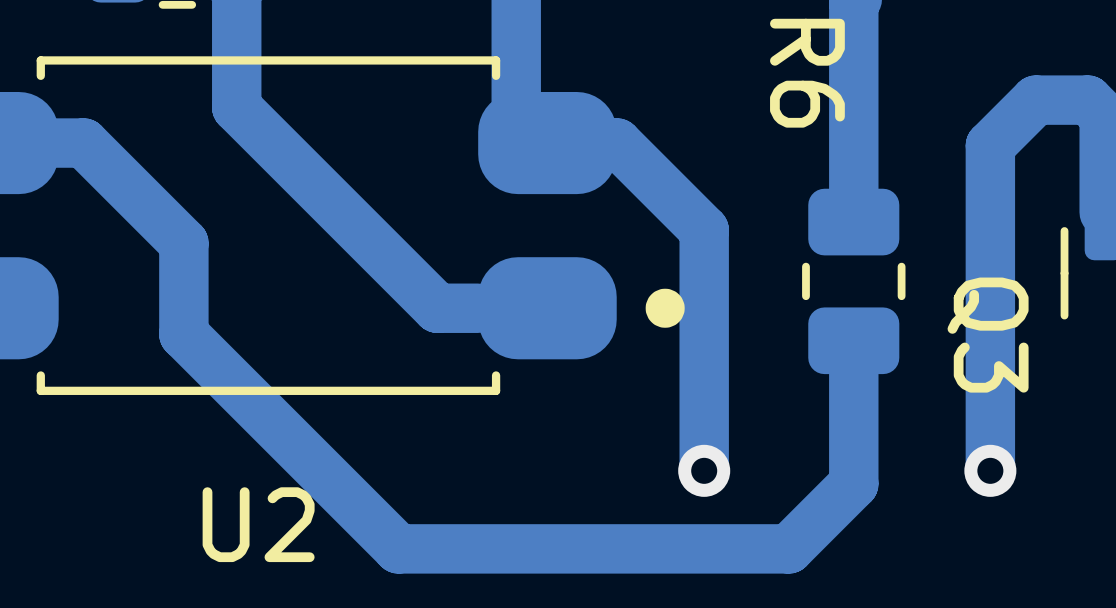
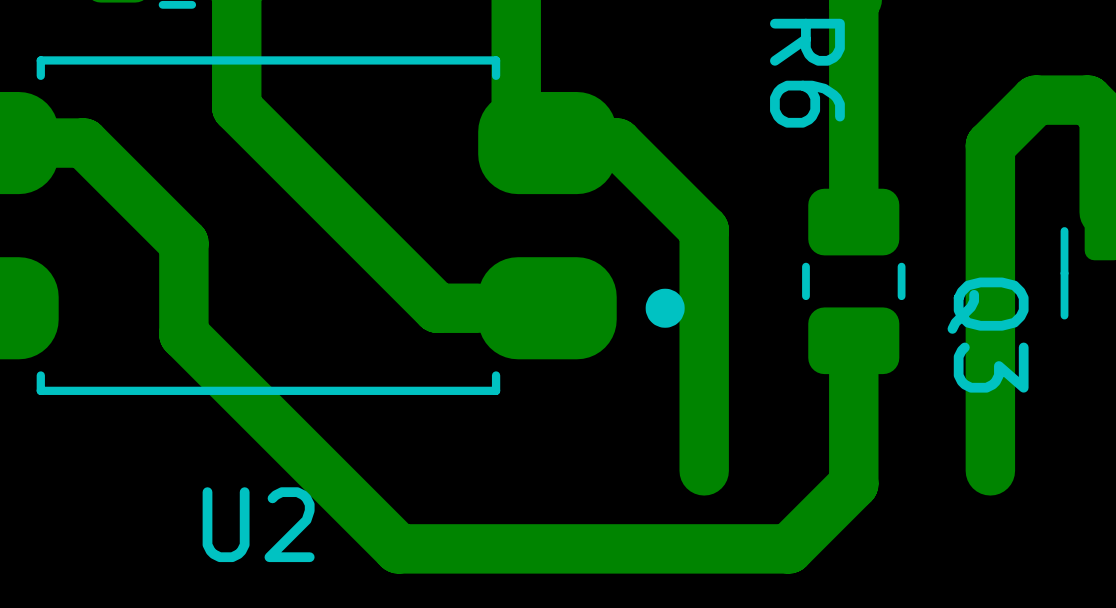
via: (704, 470) -> none
via: (990, 470) -> none

